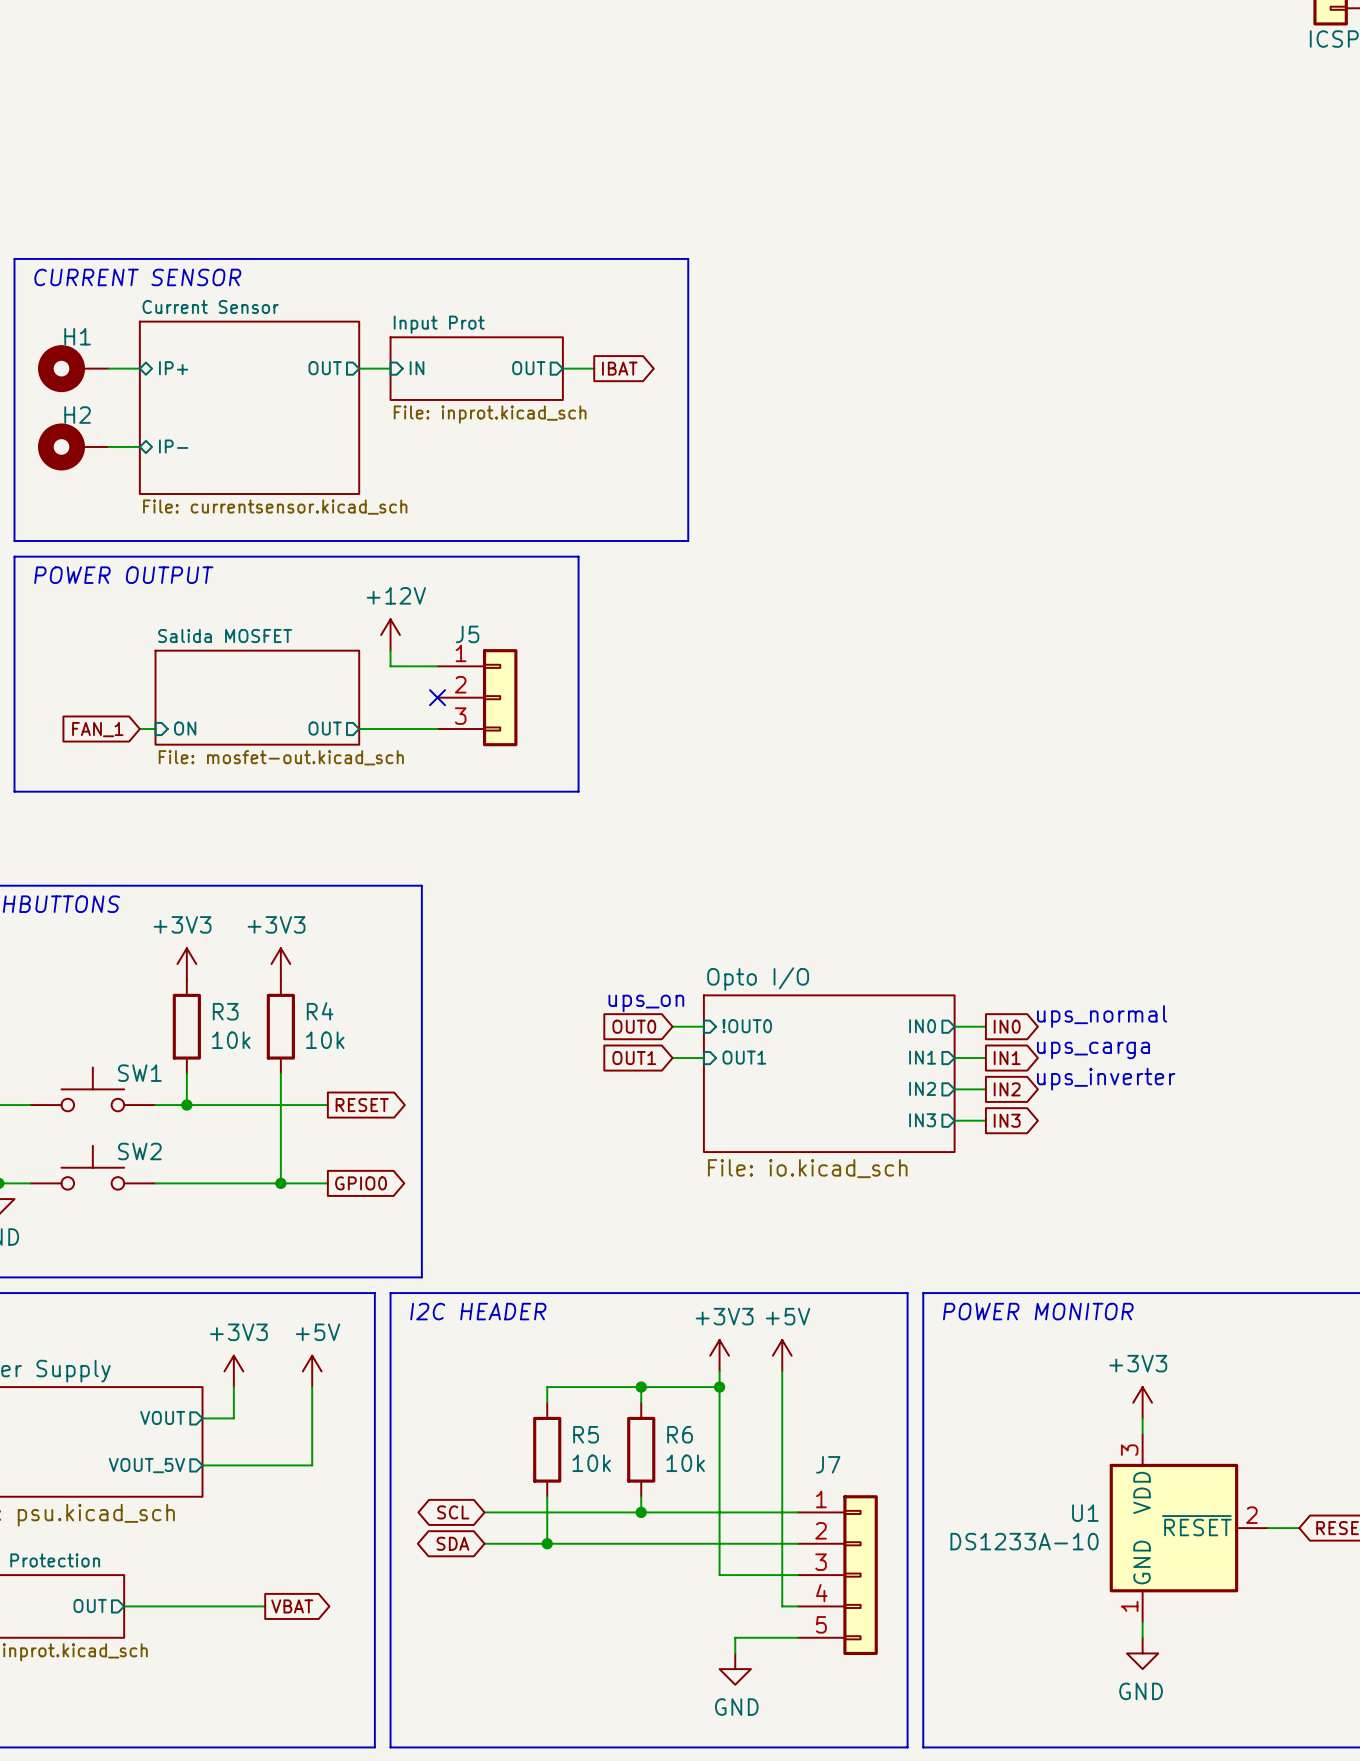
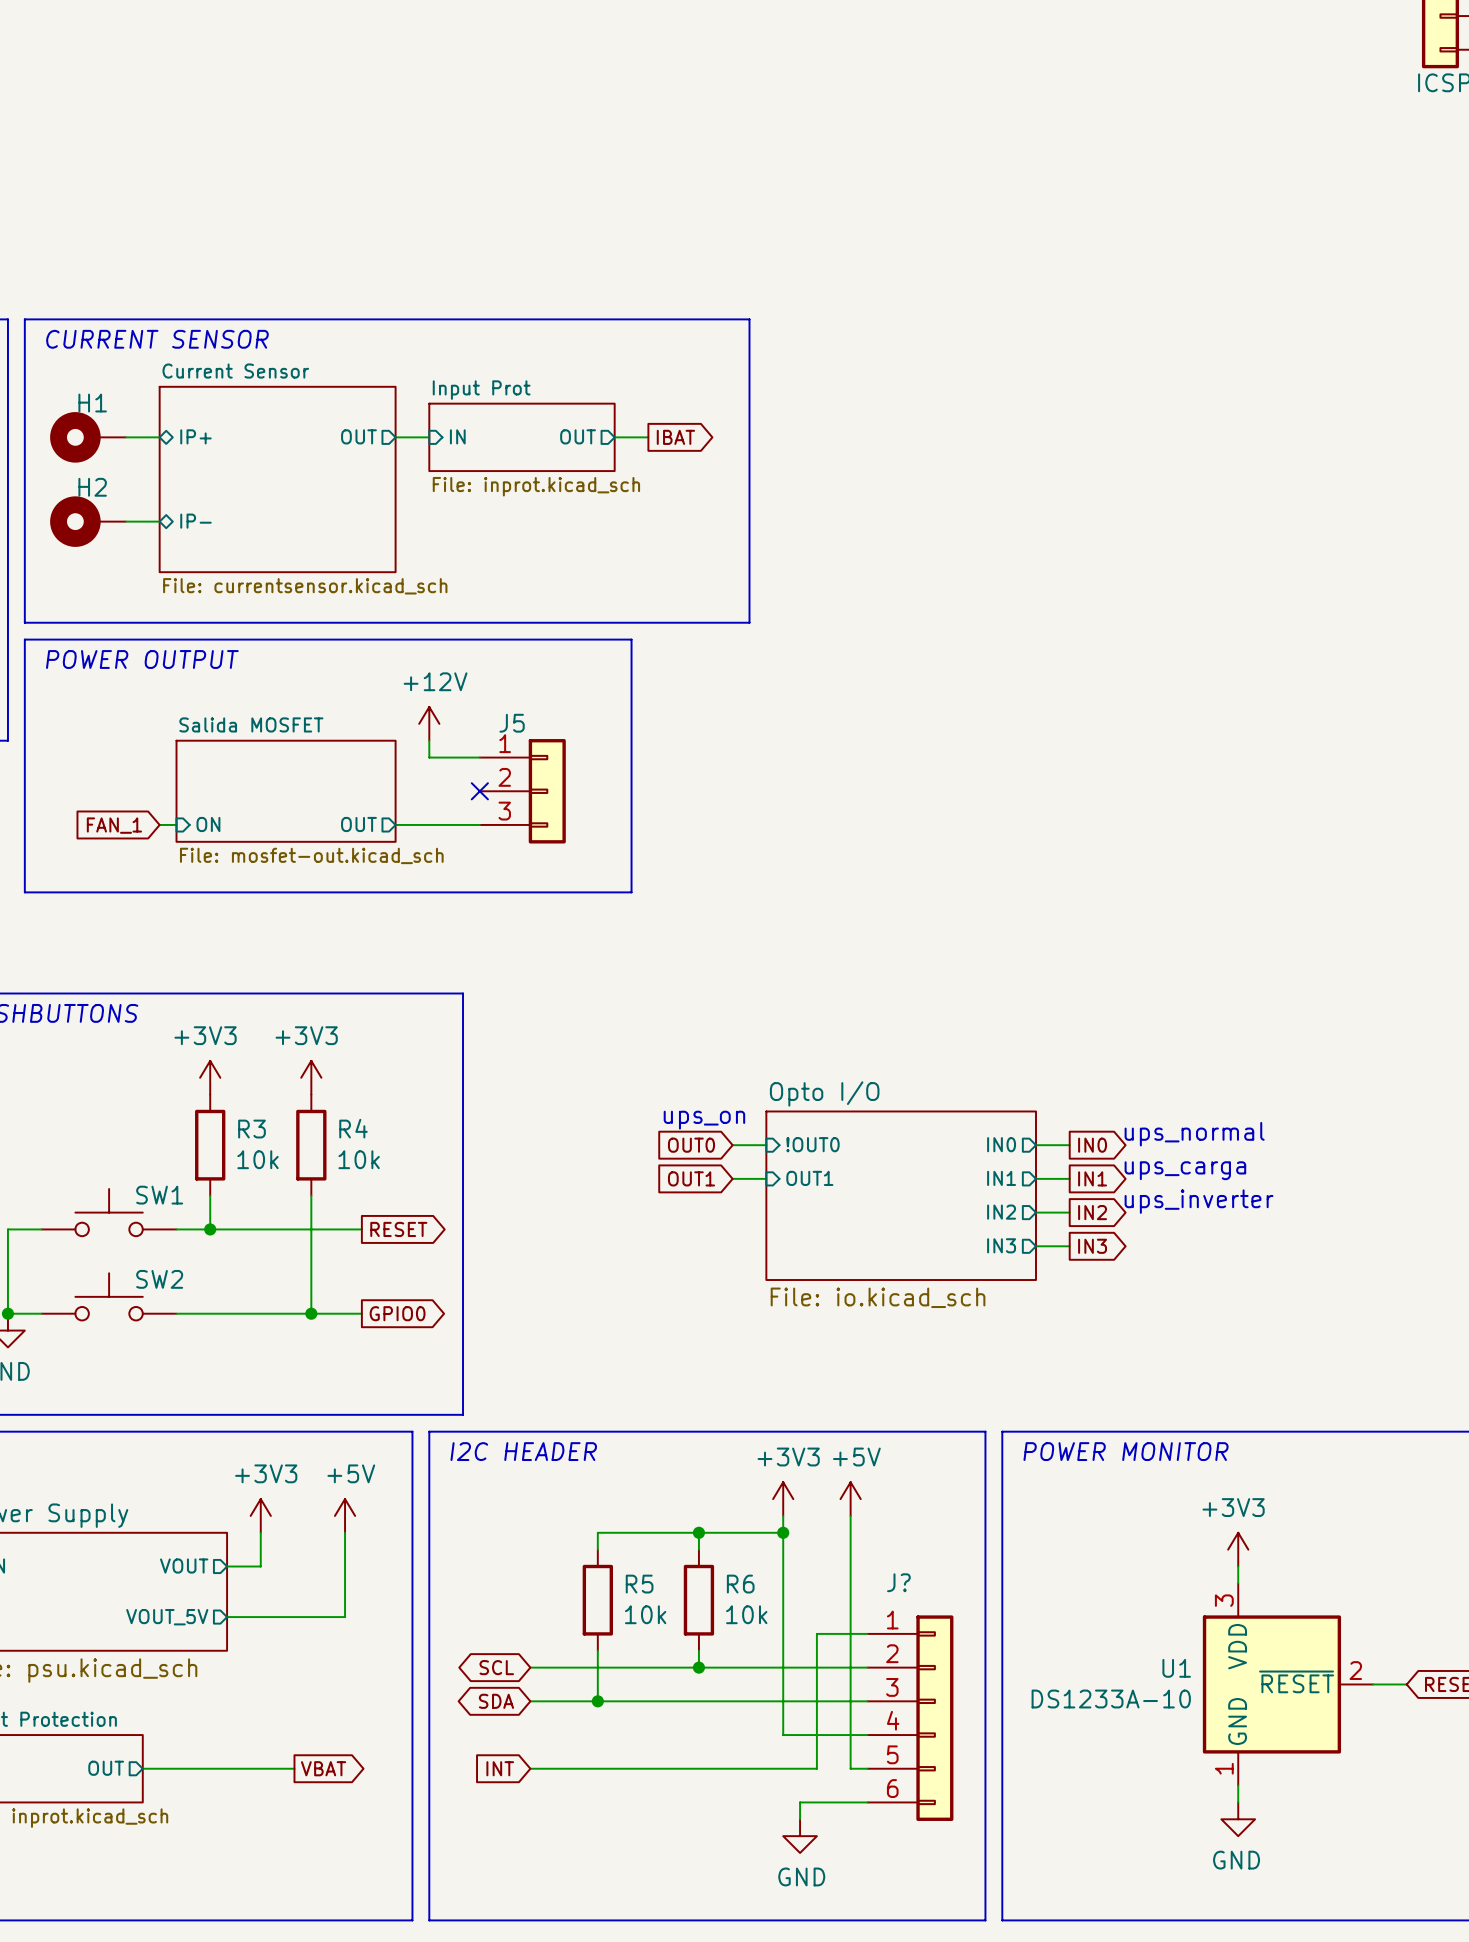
wire: none -> (867, 1633) (816, 1633) (816, 1768) (530, 1768)
J?: none -> (910, 1718)
J7: (837, 1575) -> none
global label: none -> INT (500, 1768)

